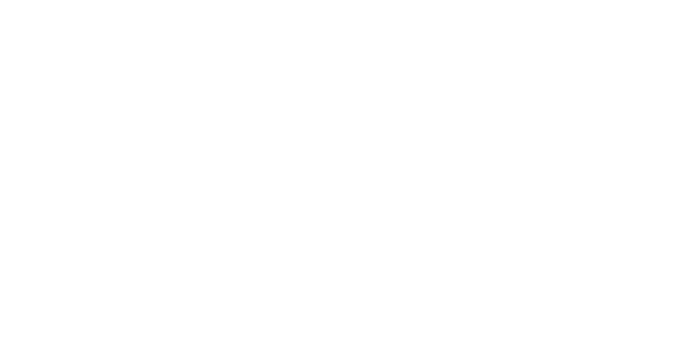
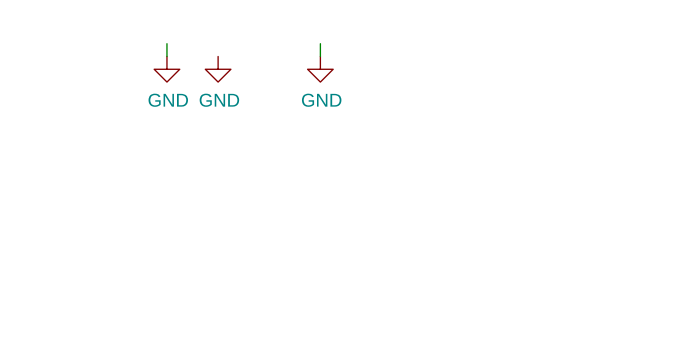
wire: none -> (166, 43) (166, 56)
wire: none -> (320, 43) (320, 56)
power symbol: none -> GND (166, 69)
power symbol: none -> GND (218, 69)
power symbol: none -> GND (320, 69)

